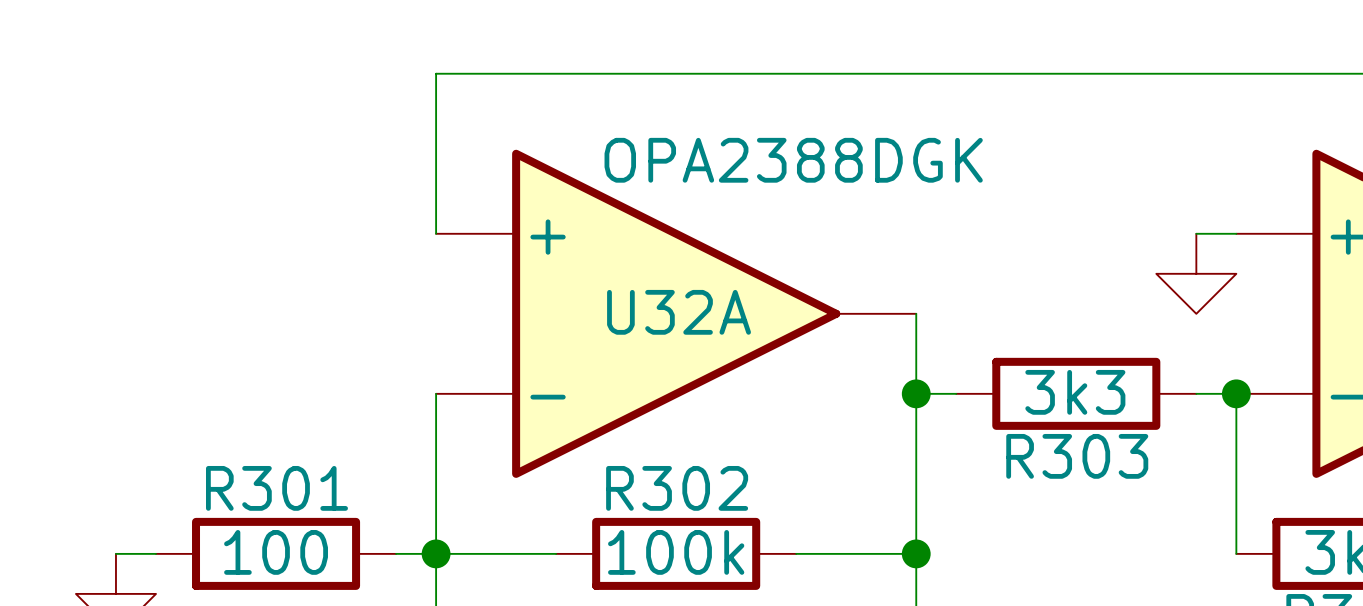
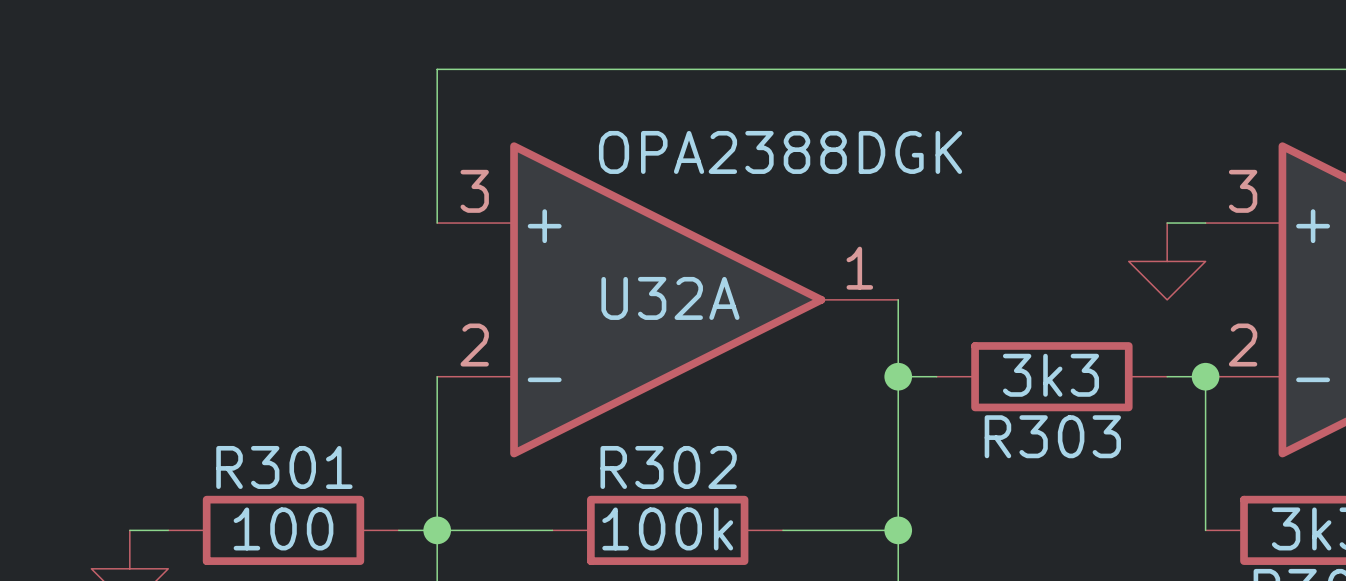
U32A pin number: none -> 3 (474, 191)
part pin number: none -> 3 (1243, 191)
U32A pin number: none -> 1 (859, 268)
U32A pin number: none -> 2 (474, 345)
part pin number: none -> 2 (1243, 345)

